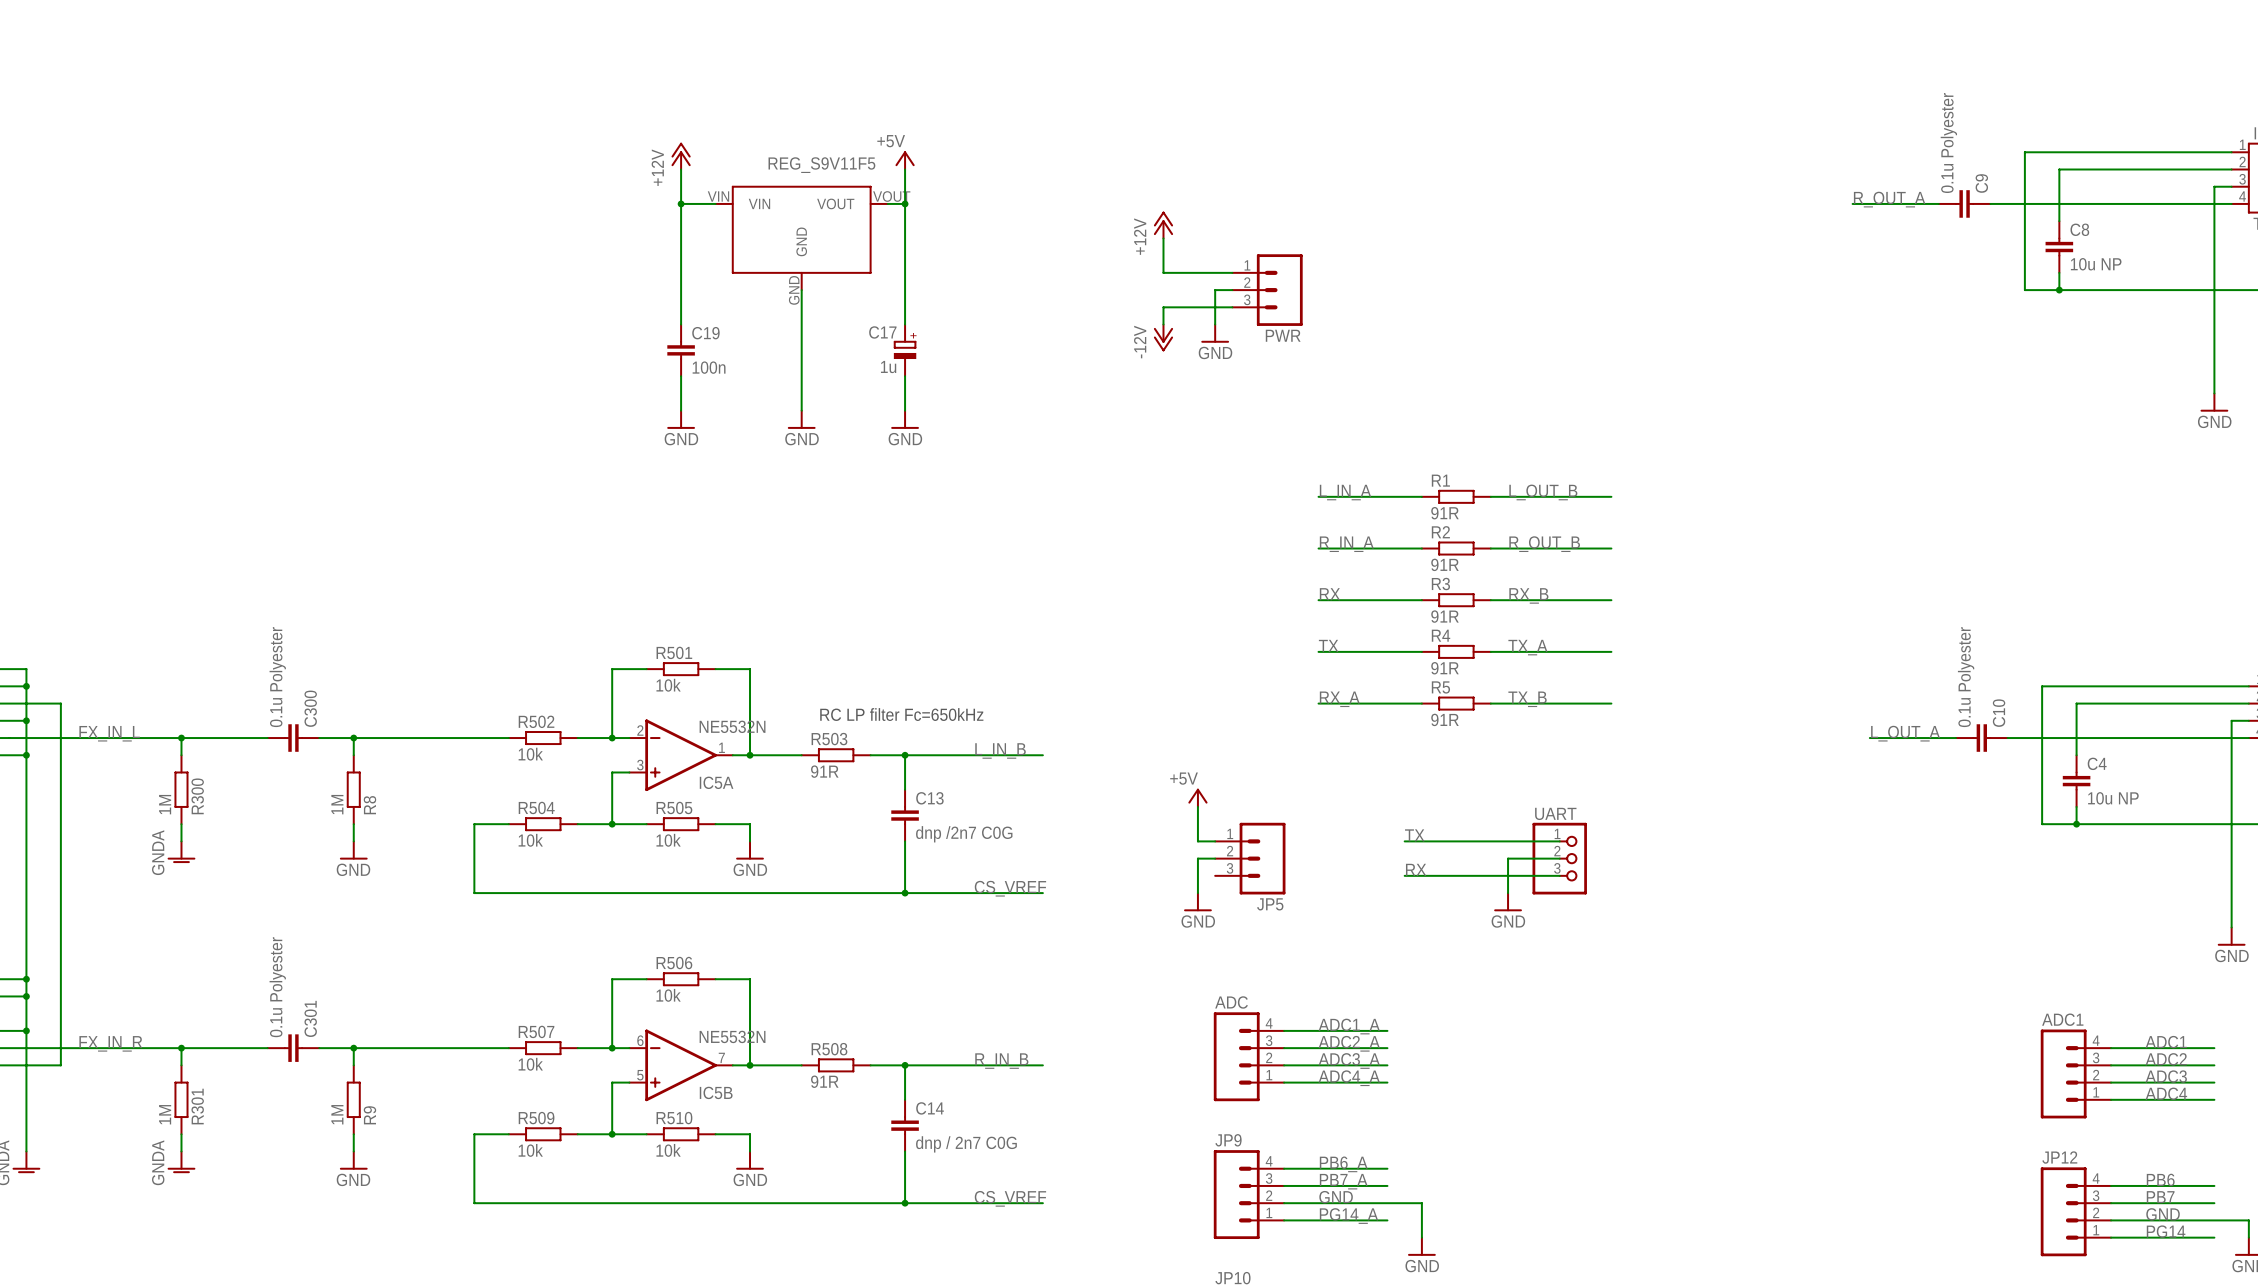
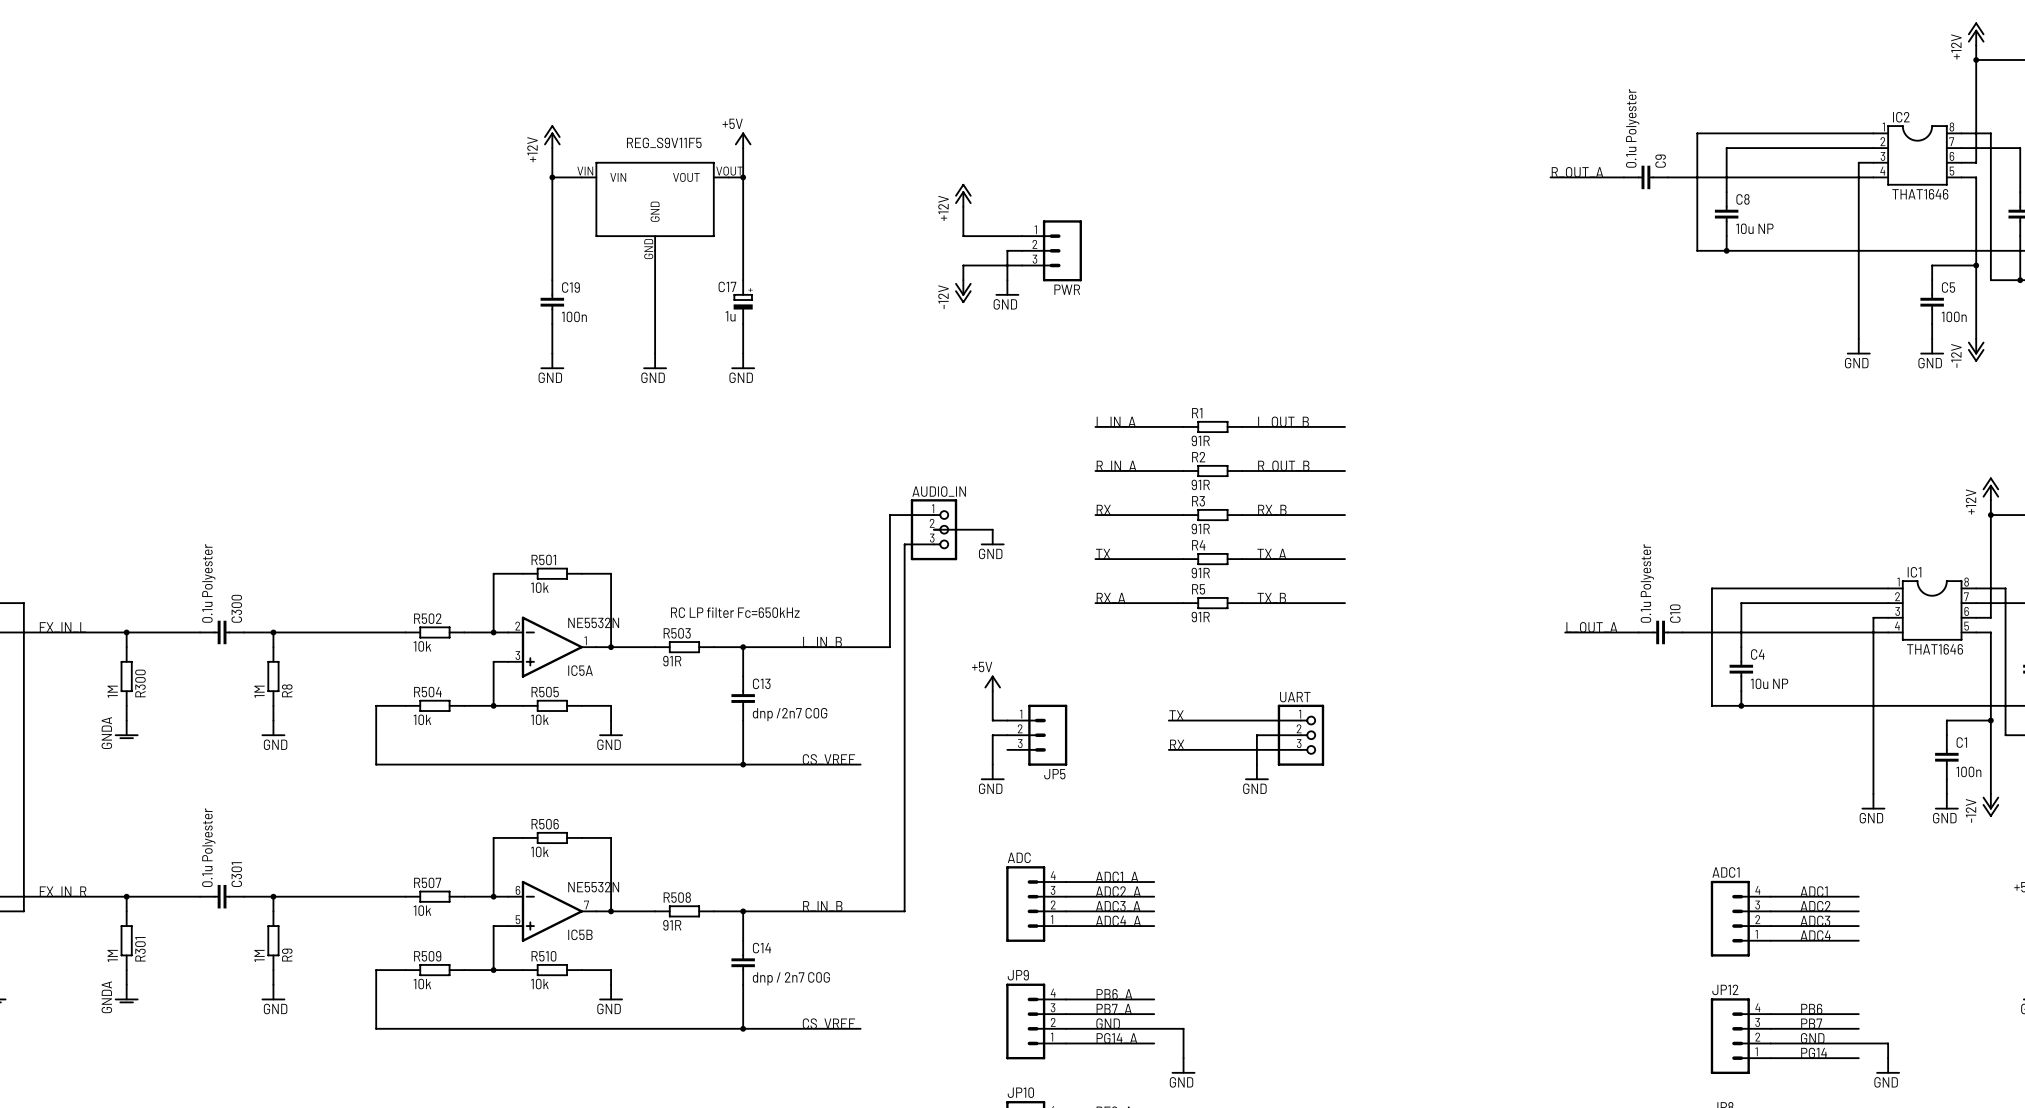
wire: none -> (933, 515) (889, 515) (889, 647) (860, 647)
wire: none -> (933, 529) (992, 529)
AUDIO_IN: none -> (933, 529)
power symbol: none -> GND (992, 537)
wire: none -> (933, 544) (904, 544) (904, 911) (860, 911)

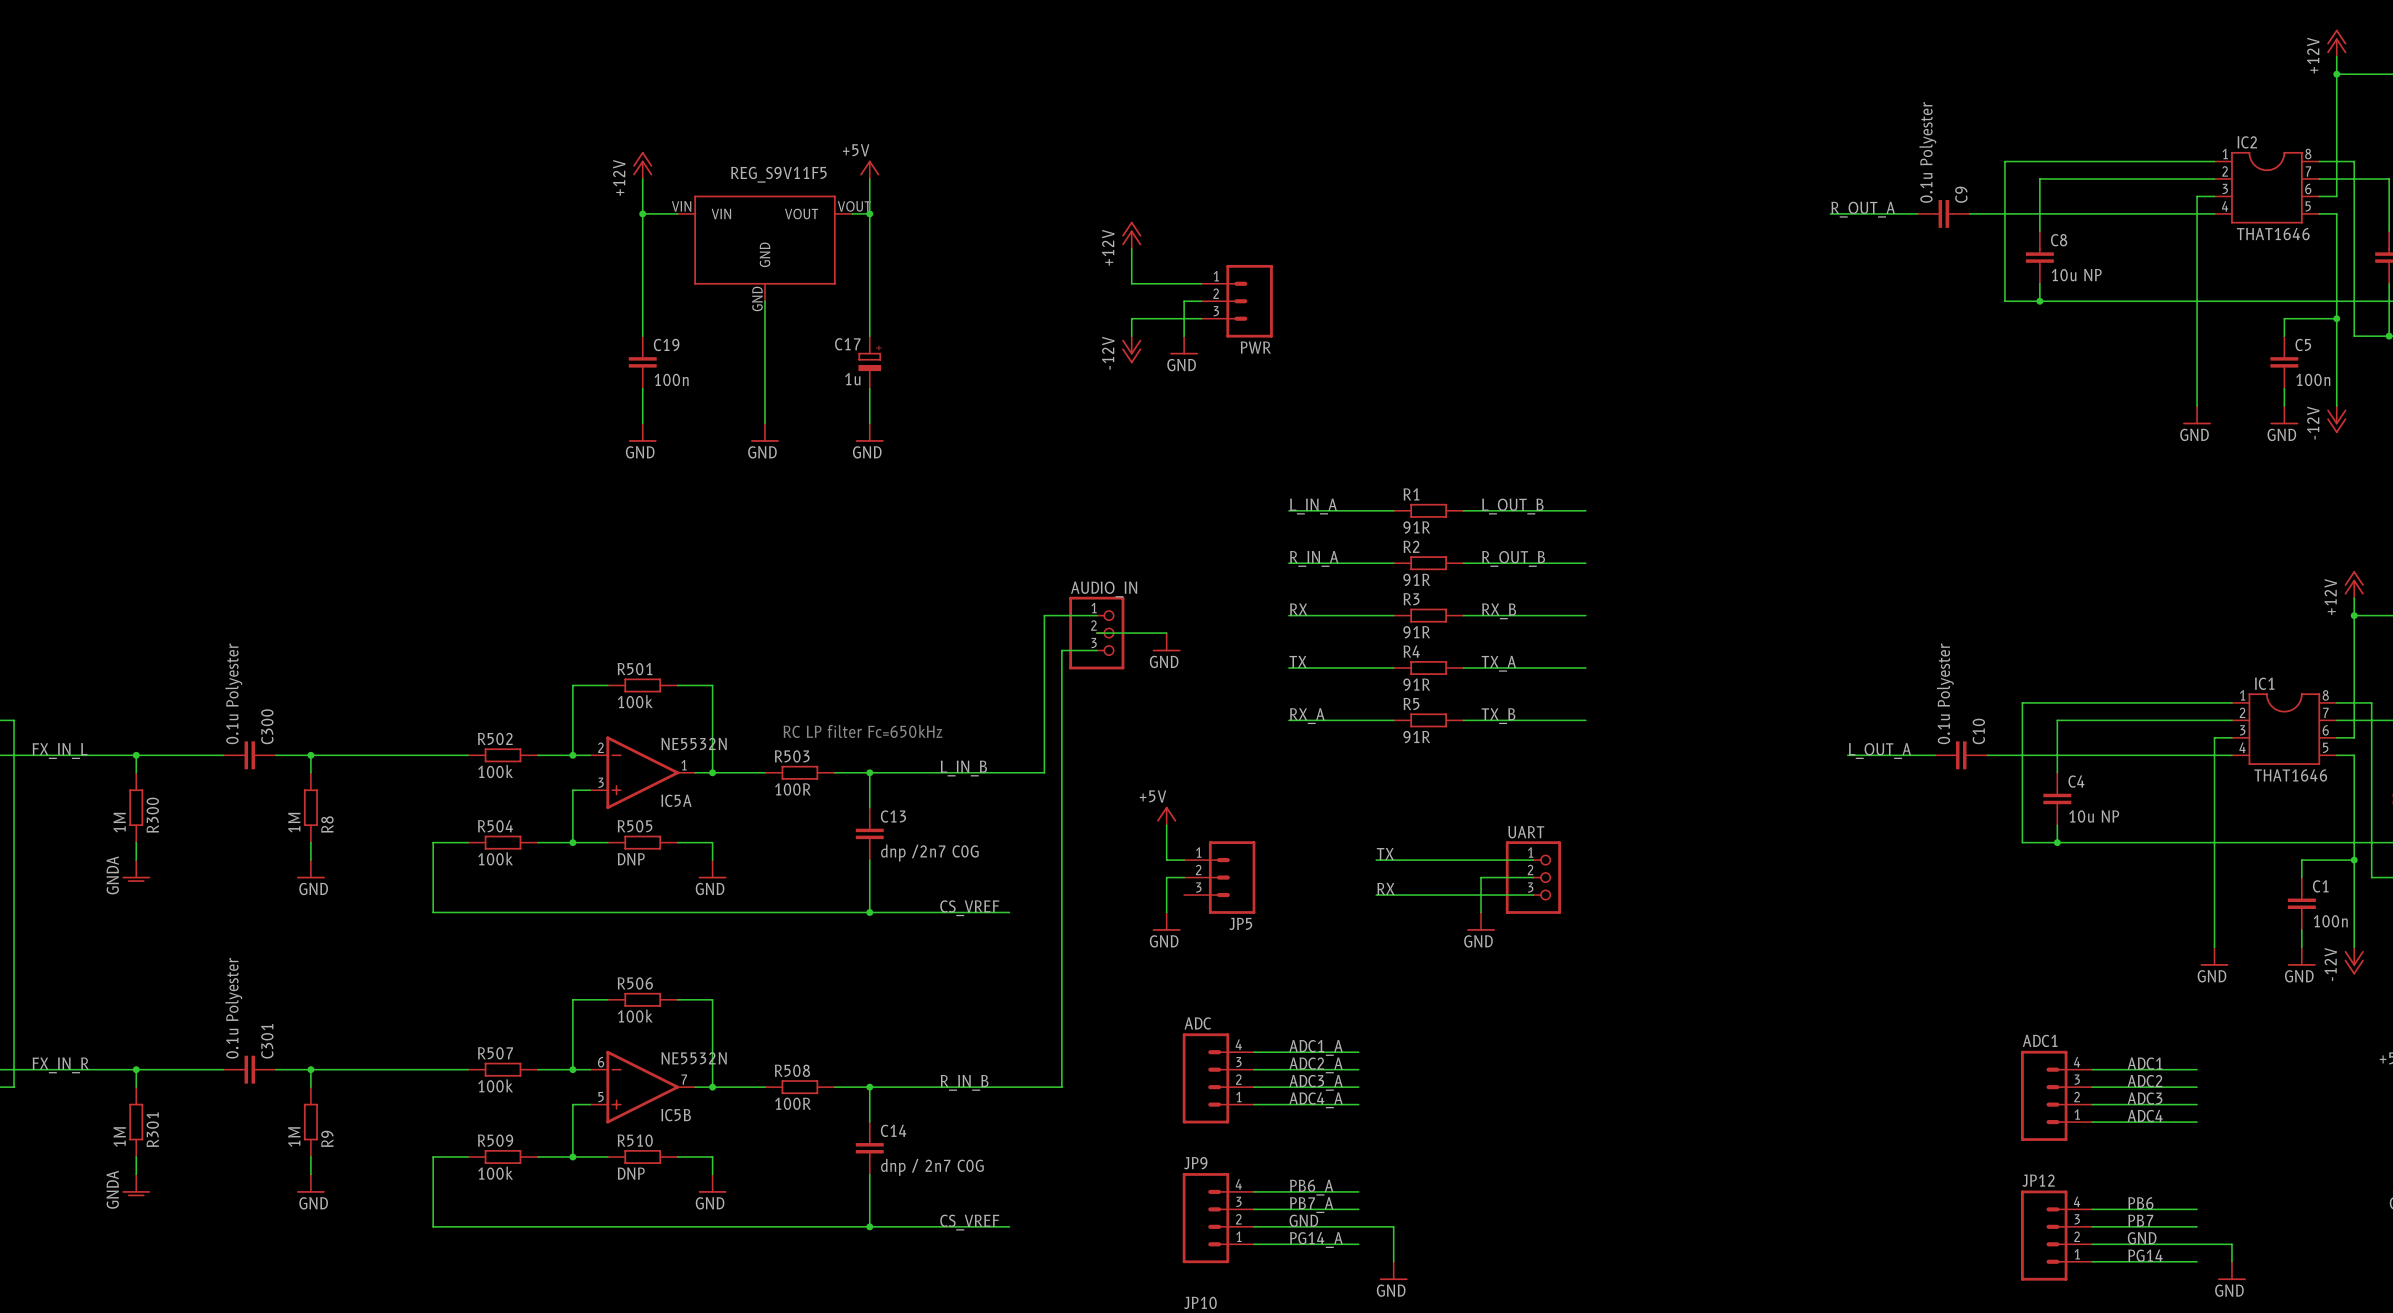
R501 value: 10k (539, 587) -> 100k (635, 701)
R502 value: 10k (422, 646) -> 100k (495, 771)
R503 value: 91R (672, 661) -> 100R (793, 789)
R504 value: 10k (422, 719) -> 100k (495, 858)
R505 value: 10k (539, 719) -> DNP (631, 859)
R506 value: 10k (539, 851) -> 100k (635, 1016)
R507 value: 10k (422, 910) -> 100k (495, 1085)
R508 value: 91R (672, 925) -> 100R (793, 1103)
R509 value: 10k (422, 984) -> 100k (495, 1173)
R510 value: 10k (539, 984) -> DNP (631, 1173)

